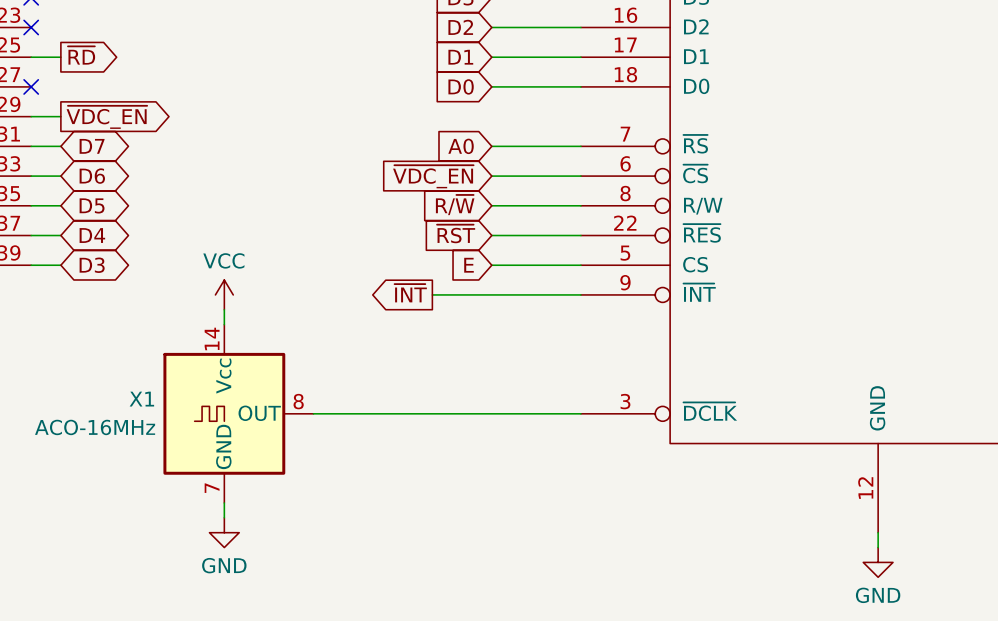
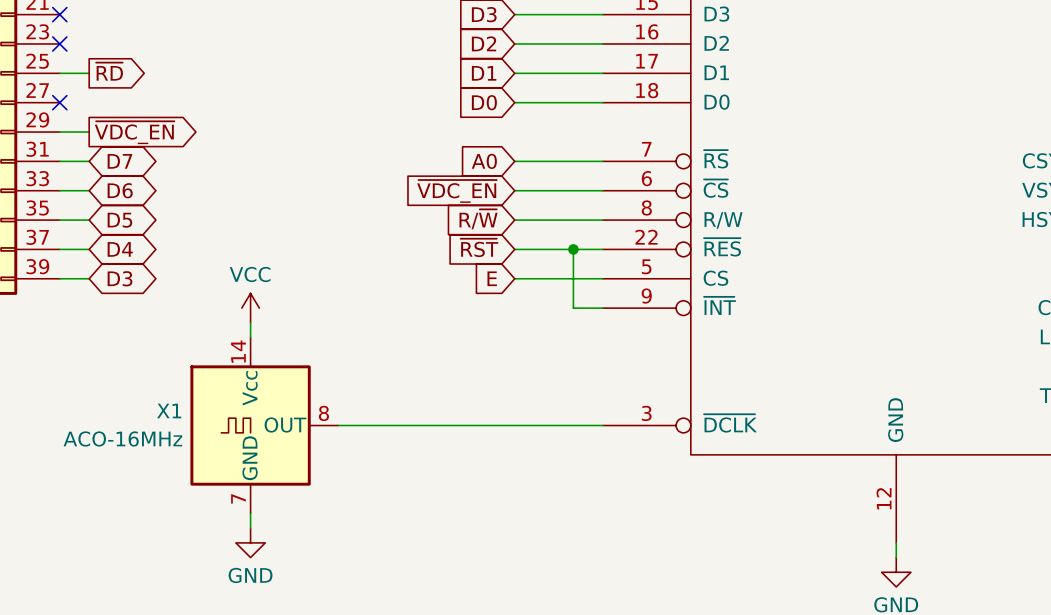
junction: none -> (573, 249)
global label: ~{INT} (410, 293) -> none
wire: (432, 294) (551, 294) -> (573, 249) (573, 308)

